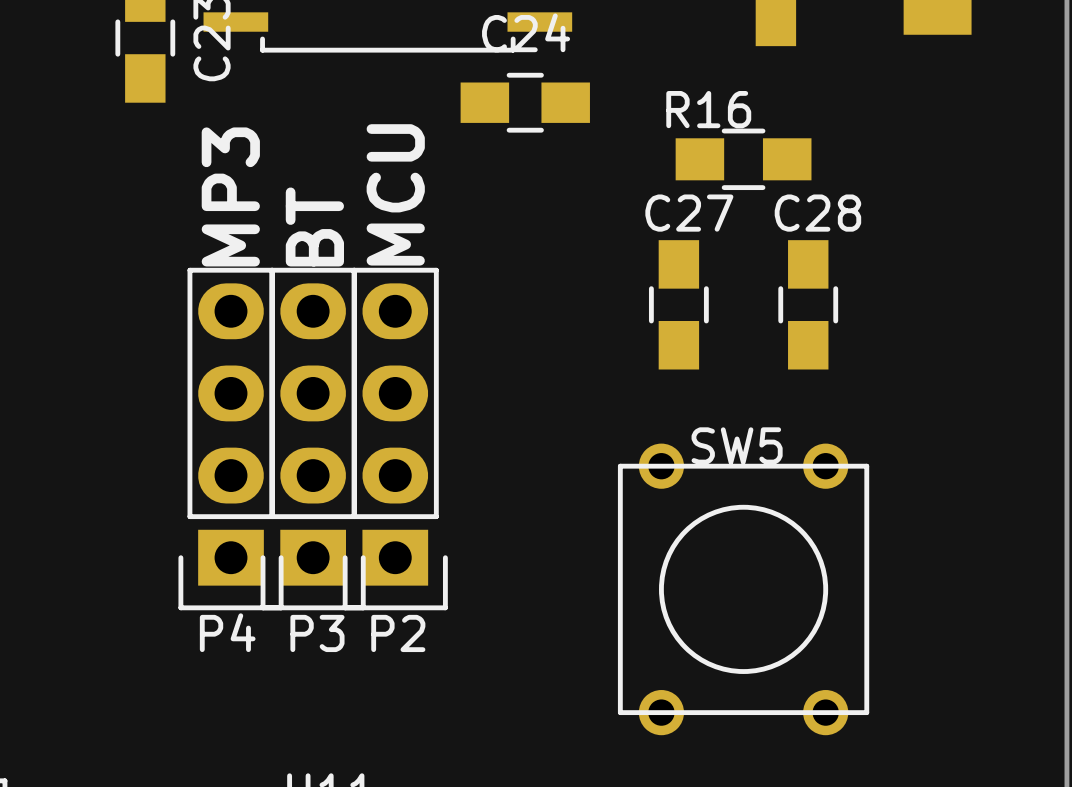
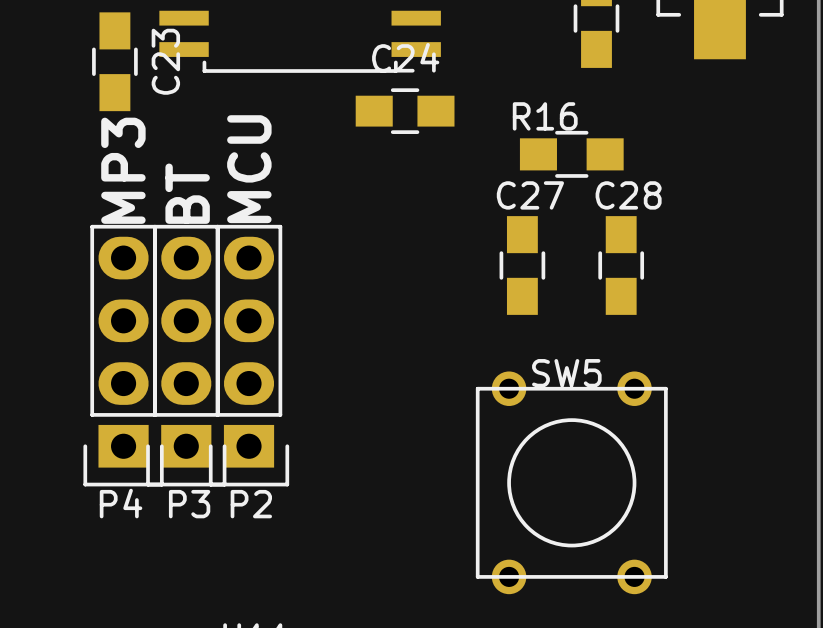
text: none -> MP3 (123, 170)
text position: MCU (395, 194) -> MCU (249, 169)
text: MP3 (230, 196) -> BT (187, 193)
text: BT (314, 226) -> none
P4 position: (231, 439) -> (123, 355)
P3 position: (313, 439) -> (186, 355)
P2 position: (395, 439) -> (249, 355)

